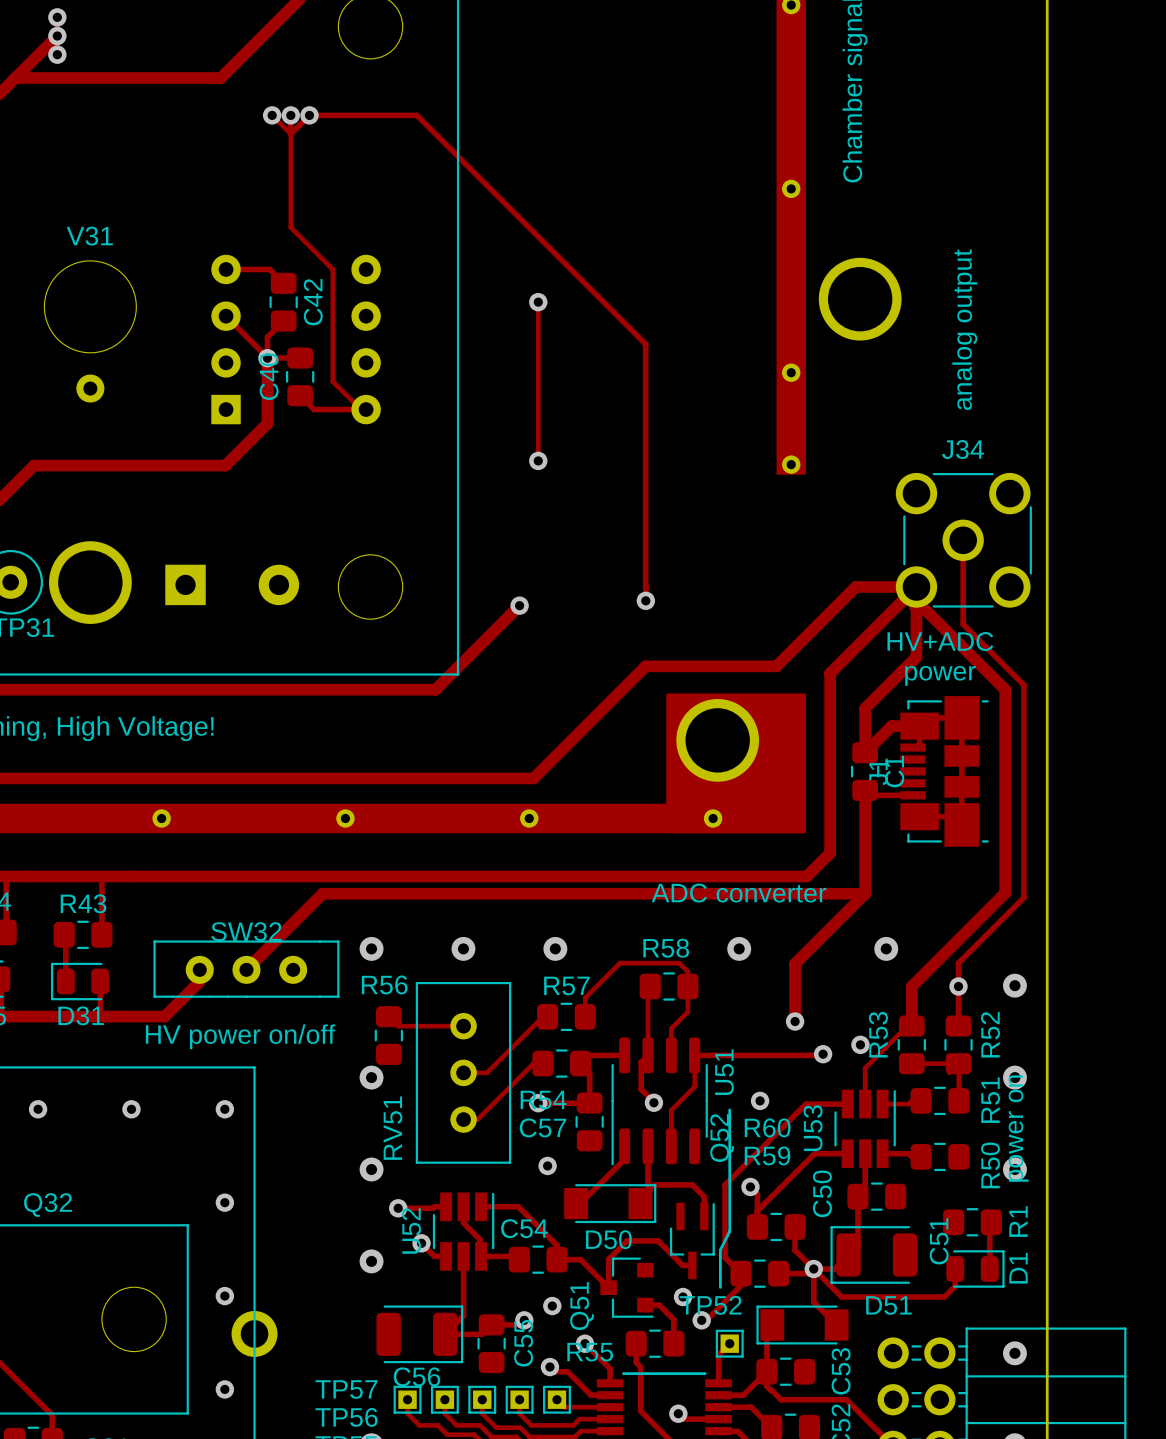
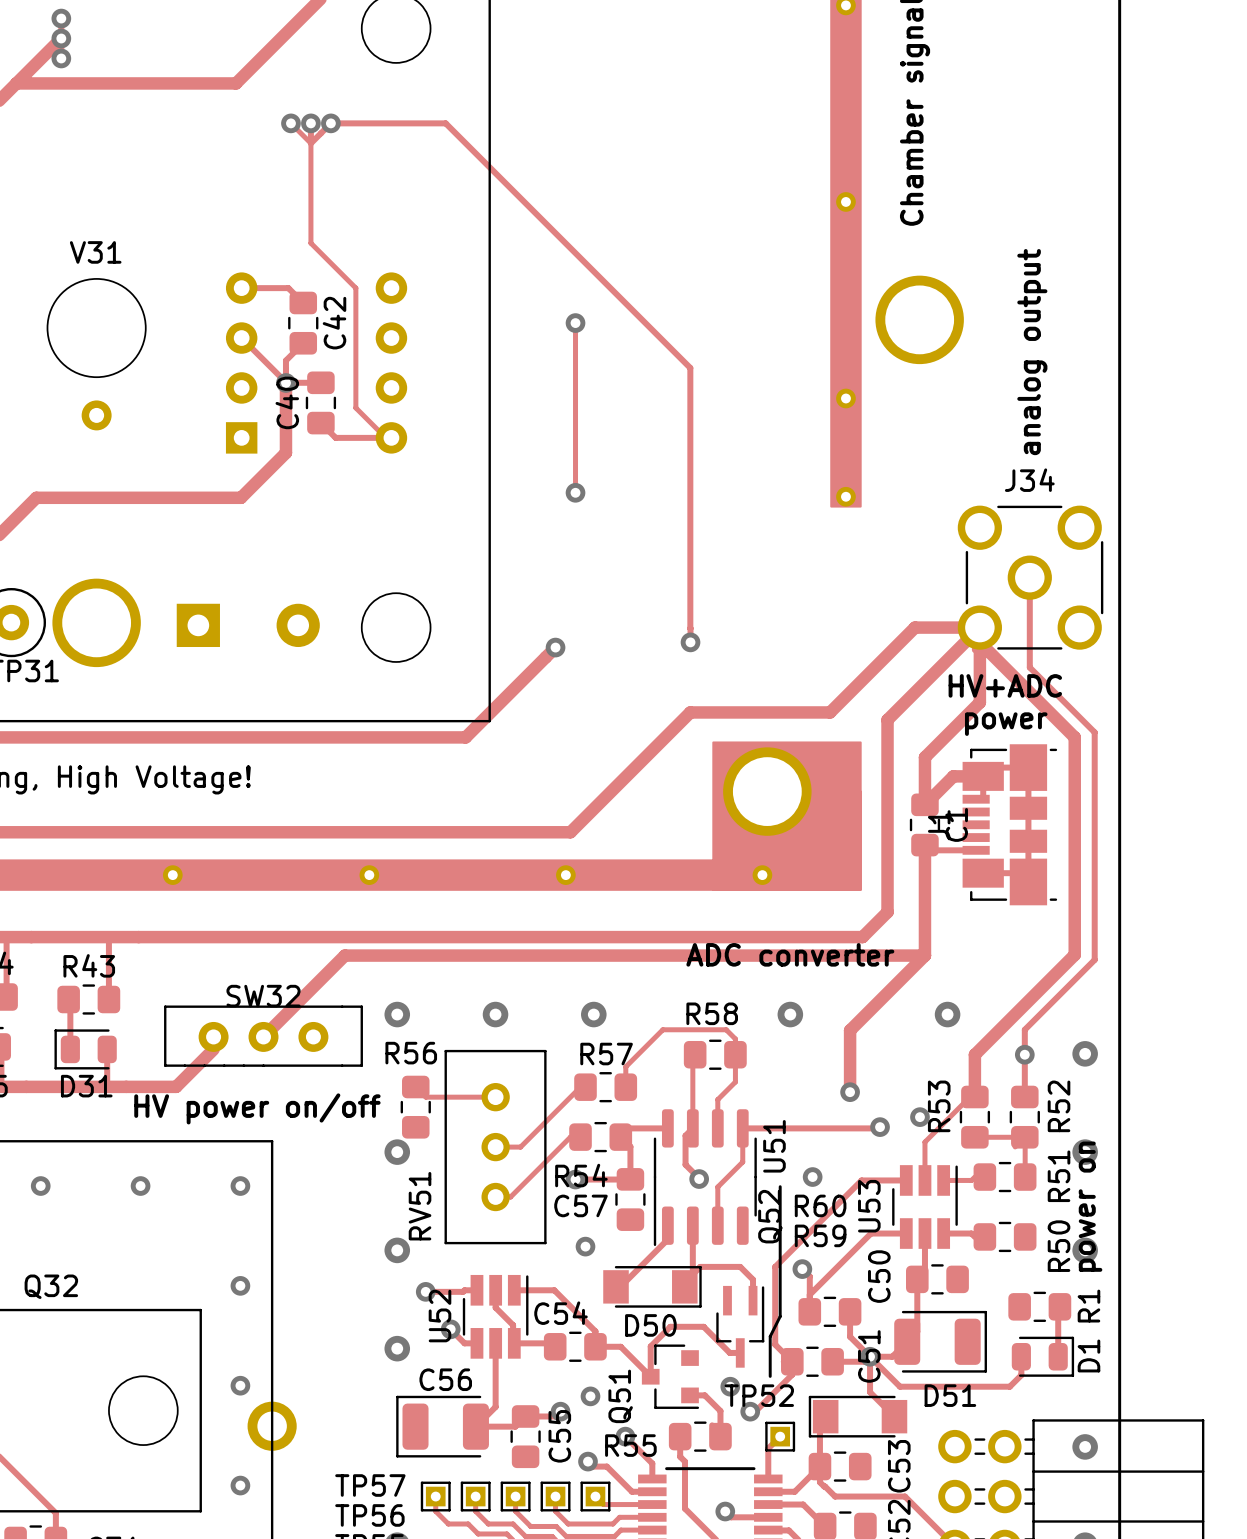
C51 rotation: 0° (873, 1254) -> 180° (940, 1341)
C56 rotation: 0° (419, 1334) -> 180° (442, 1426)

